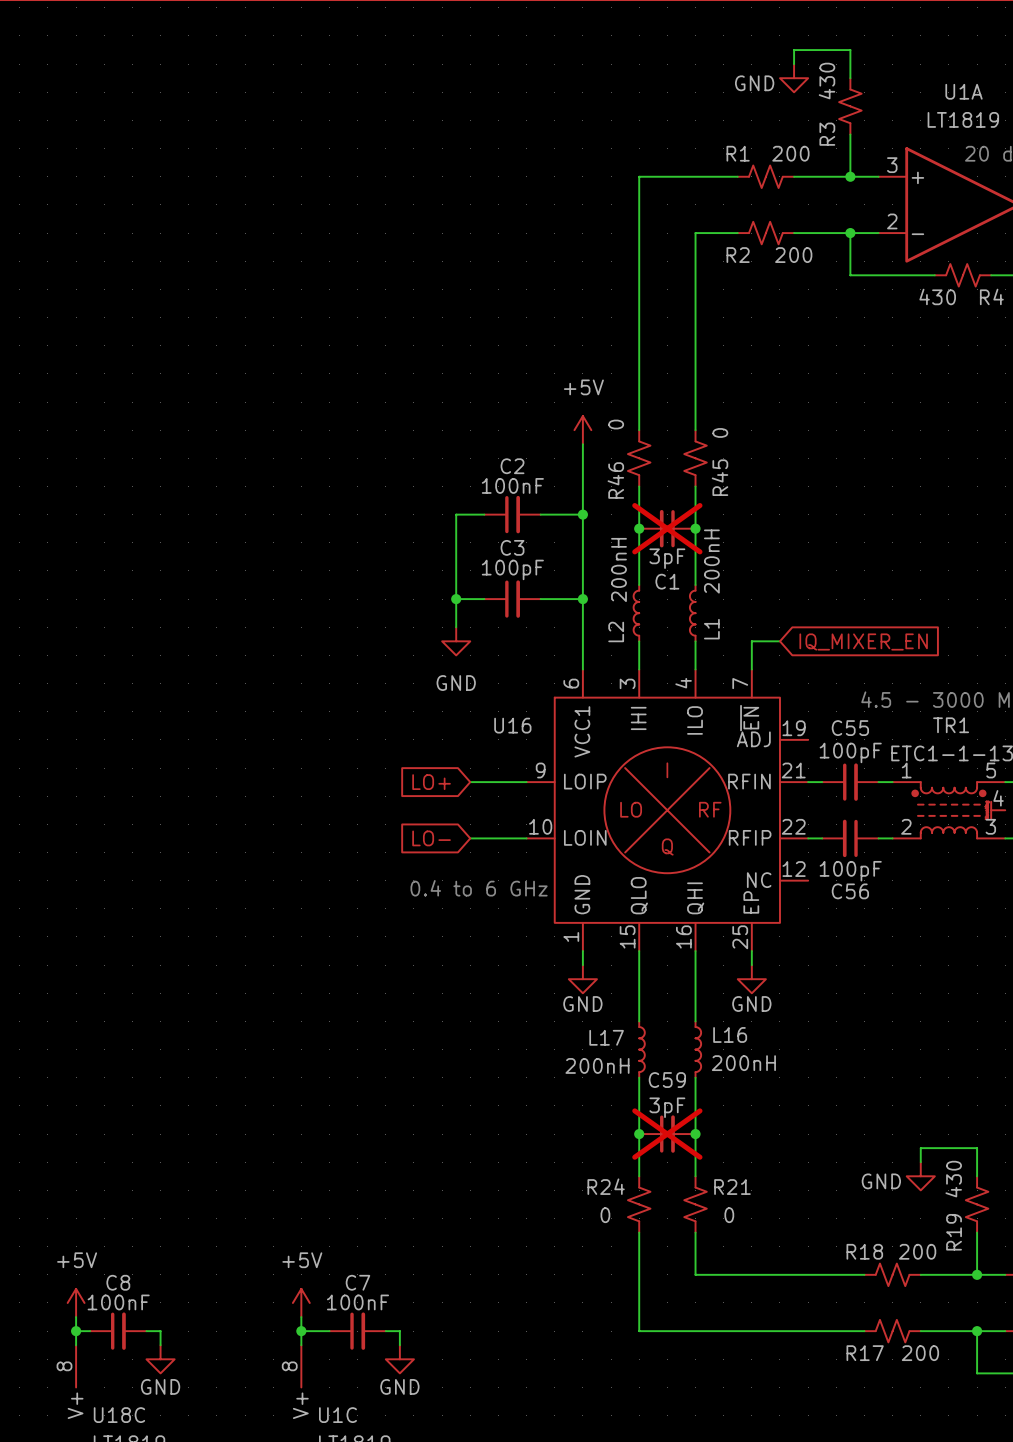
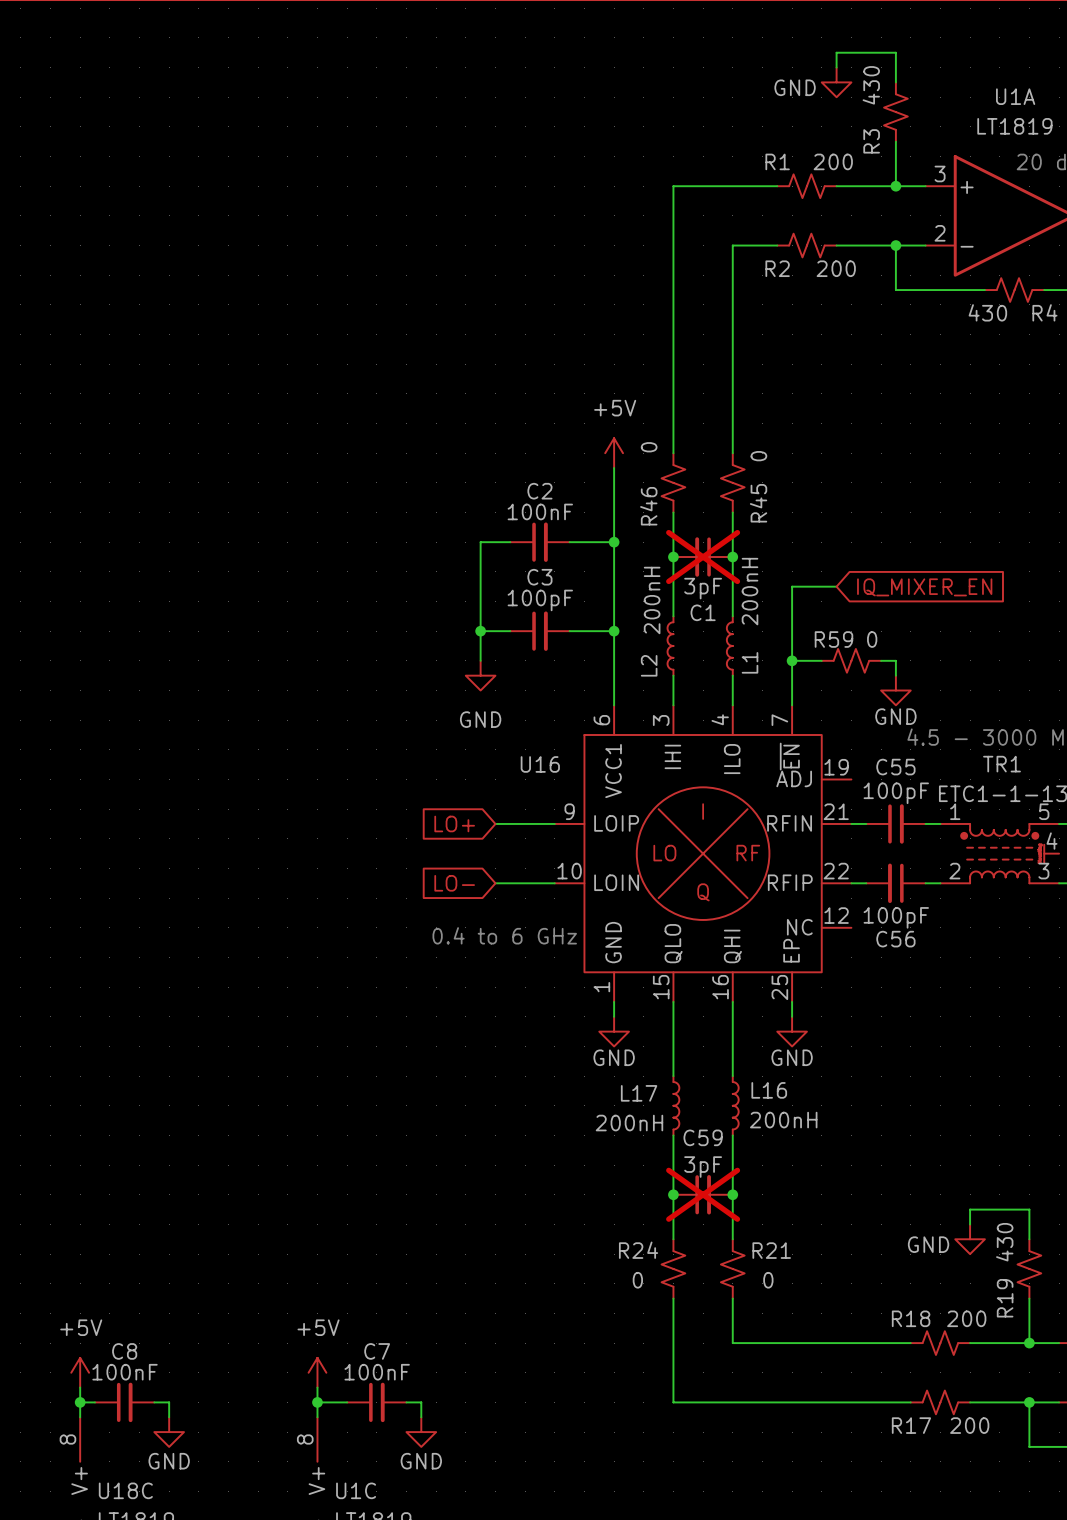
wire: none -> (792, 660) (821, 660)
junction: none -> (792, 660)
R59: none -> 0 (851, 660)
wire: (751, 641) (779, 641) -> (792, 675) (792, 586) (836, 586)
global label position: IQ_MIXER_EN (863, 641) -> IQ_MIXER_EN (924, 587)
power symbol: none -> GND (895, 690)

